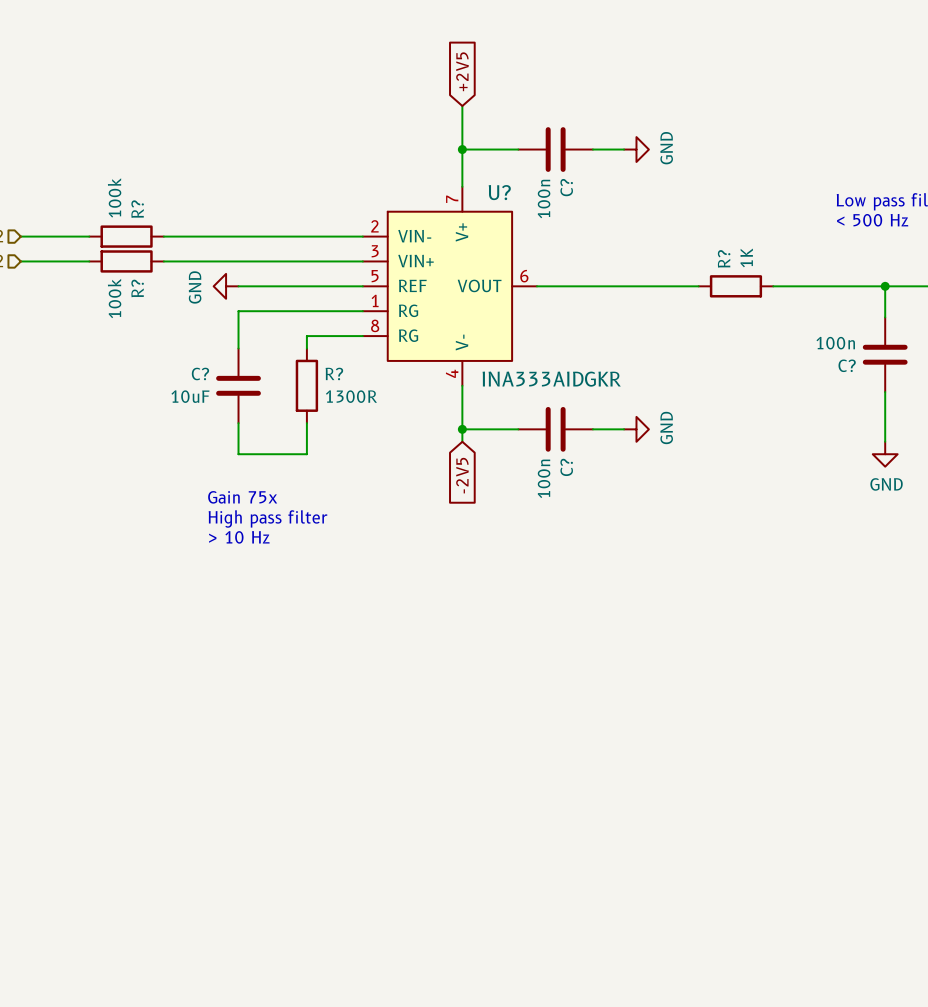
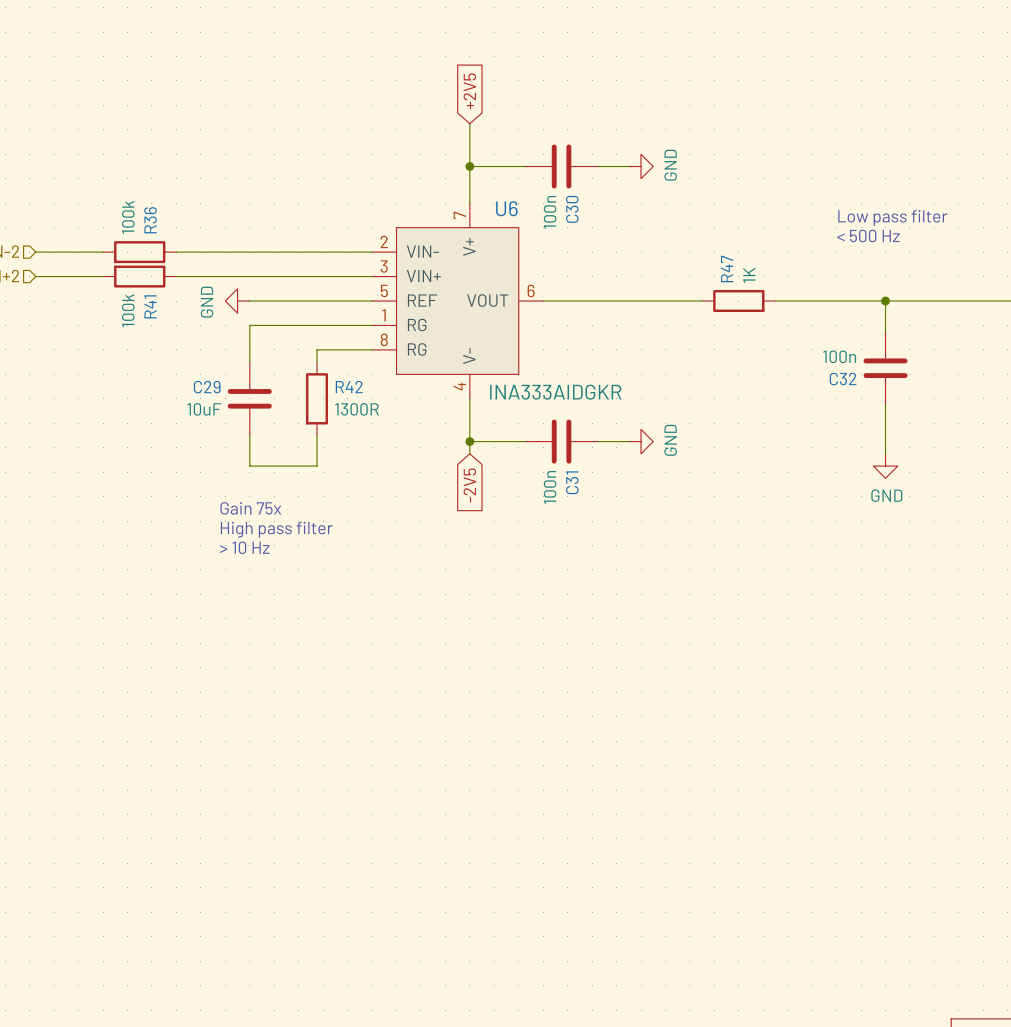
C? name: C? (566, 187) -> C30 (572, 209)
U? name: U? (499, 192) -> U6 (506, 208)
R? name: R? (137, 209) -> R36 (150, 220)
R? name: R? (724, 258) -> R47 (727, 268)
R? name: R? (137, 288) -> R41 (150, 306)
C? name: C? (847, 365) -> C32 (843, 379)
C? name: C? (200, 373) -> C29 (207, 387)
R? name: R? (334, 373) -> R42 (349, 387)
C? name: C? (566, 467) -> C31 (572, 482)

